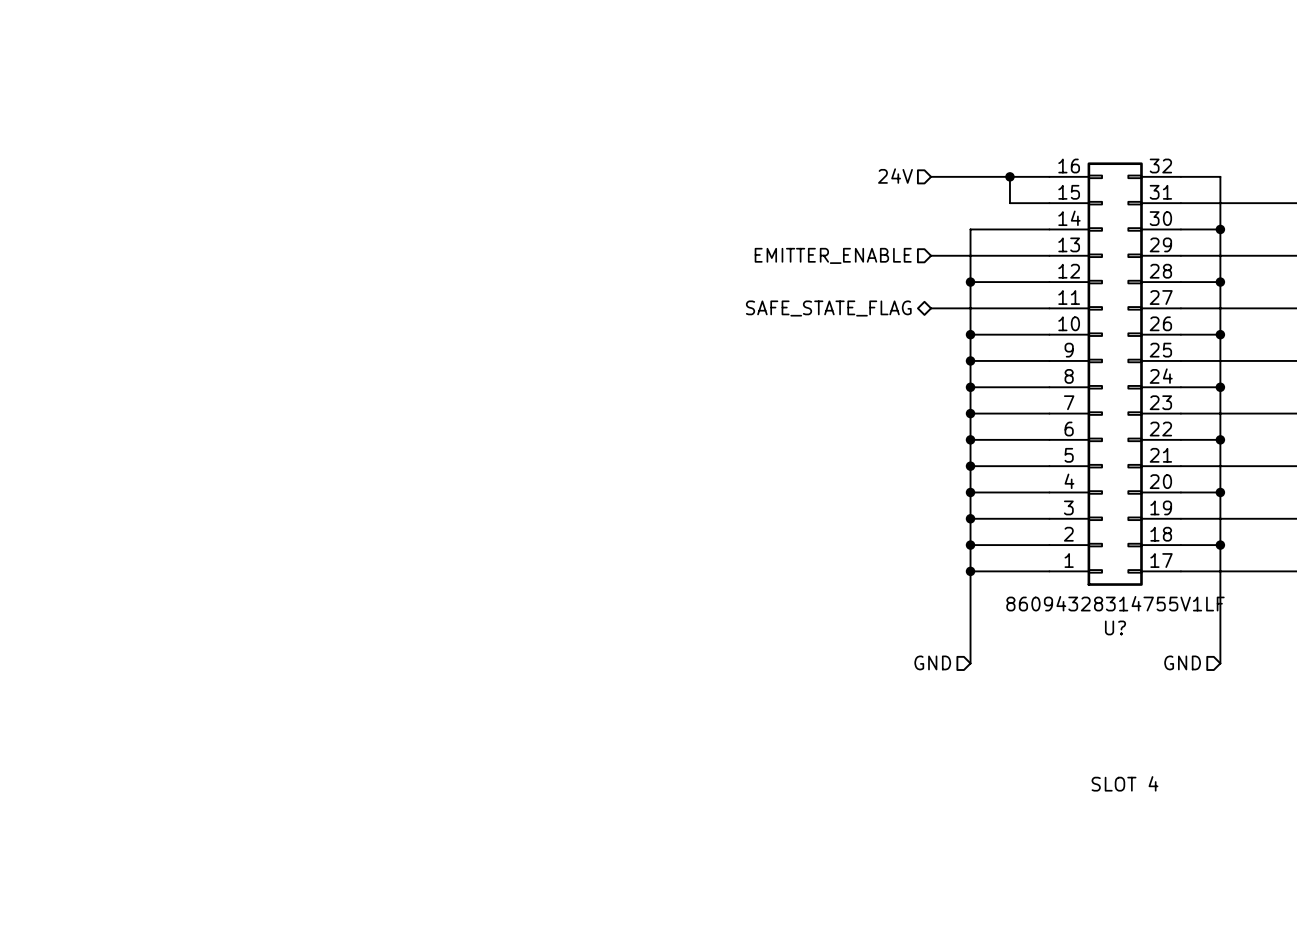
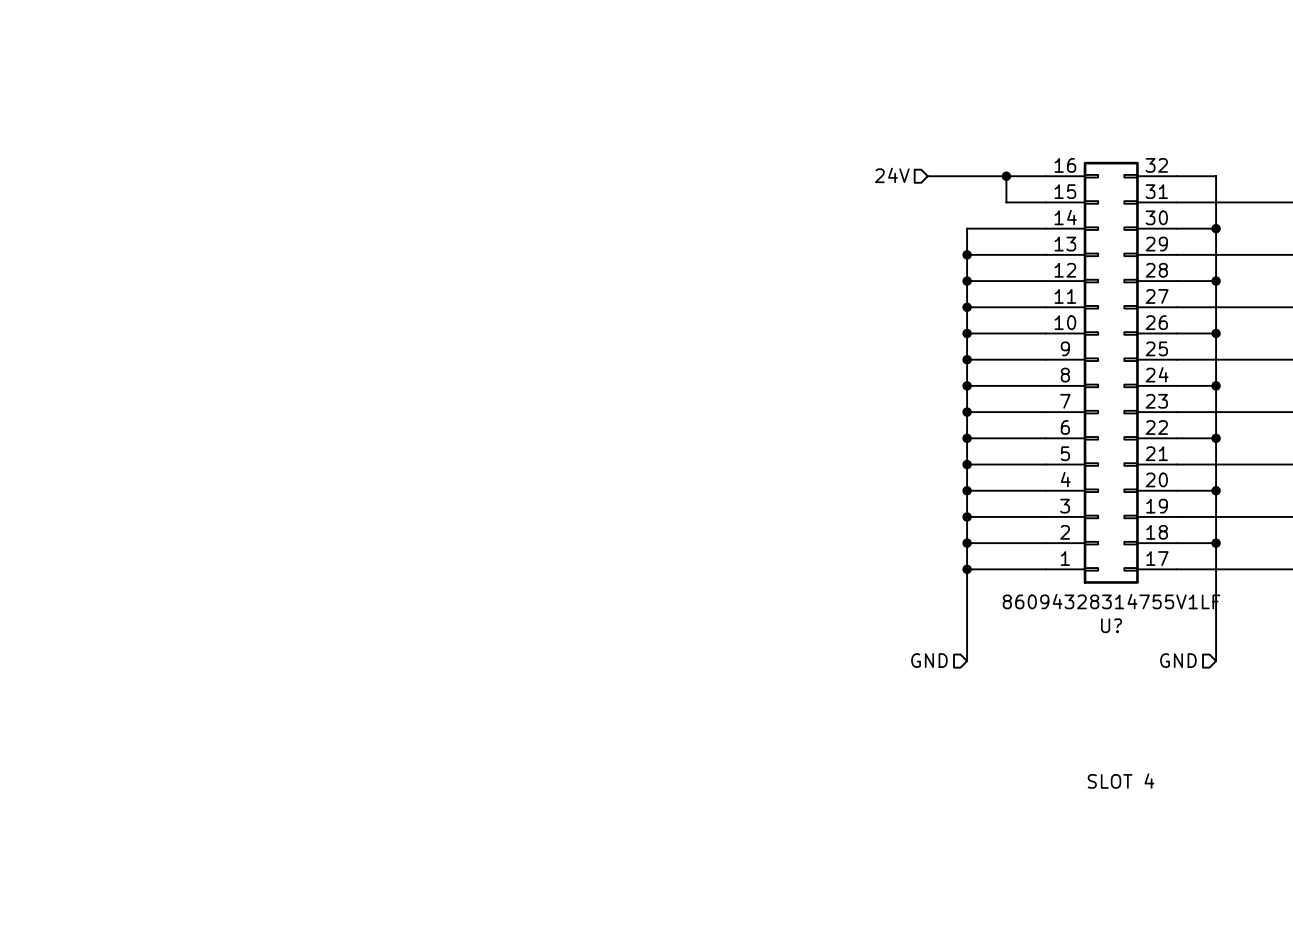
hierarchical label: EMITTER_ENABLE (833, 255) -> none
wire: (931, 255) (970, 255) -> none
junction: none -> (967, 254)
hierarchical label: SAFE_STATE_FLAG (828, 308) -> none
wire: (931, 308) (970, 308) -> none
junction: none -> (967, 307)

